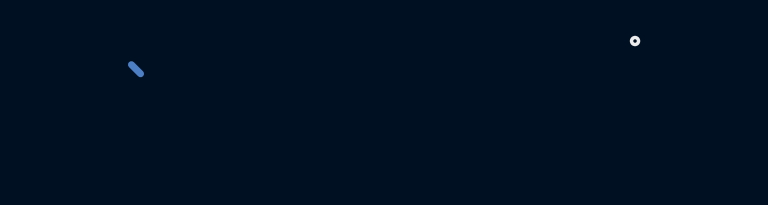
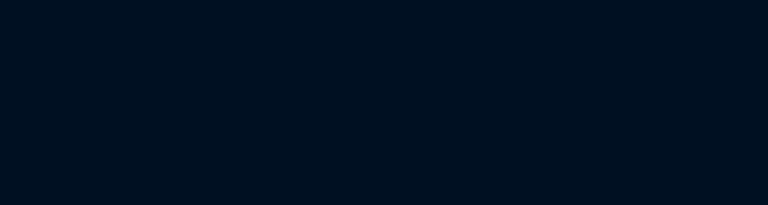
via: (635, 41) -> none
track: (131, 64) (140, 73) -> none

